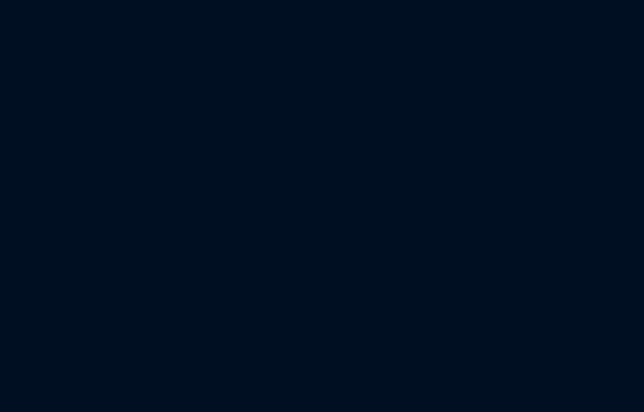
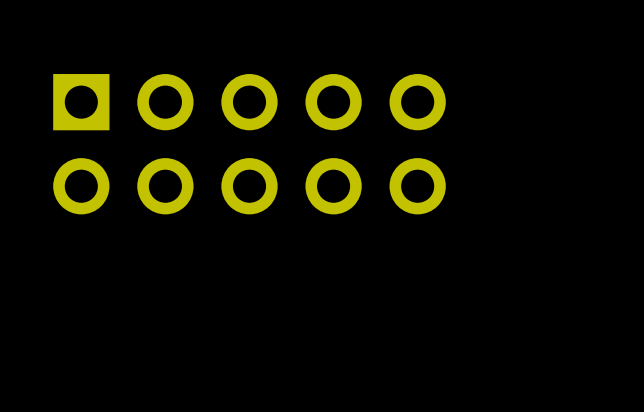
part: none -> (249, 144)

